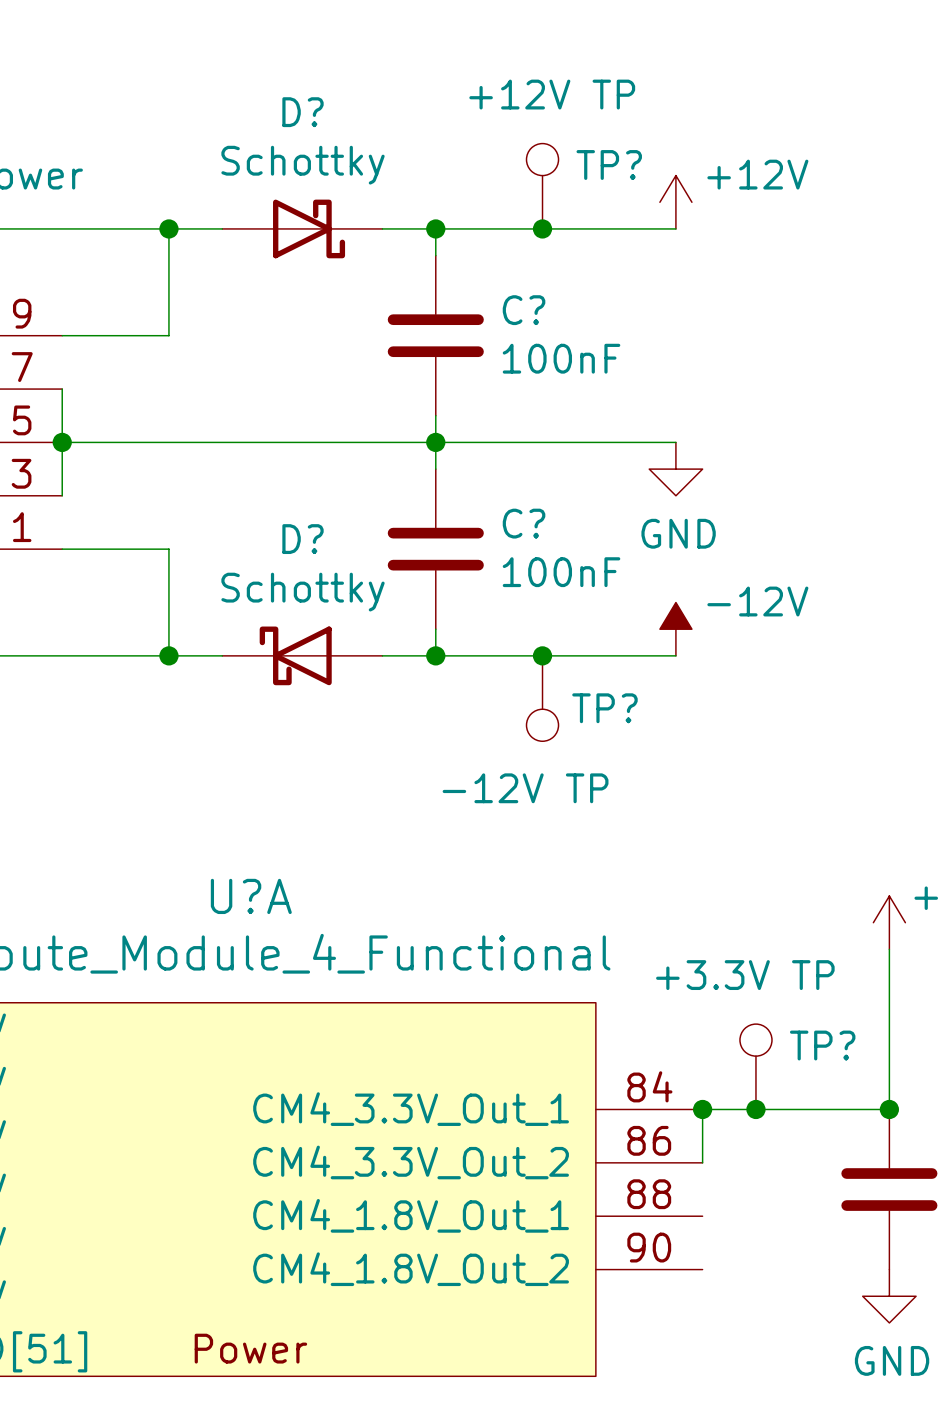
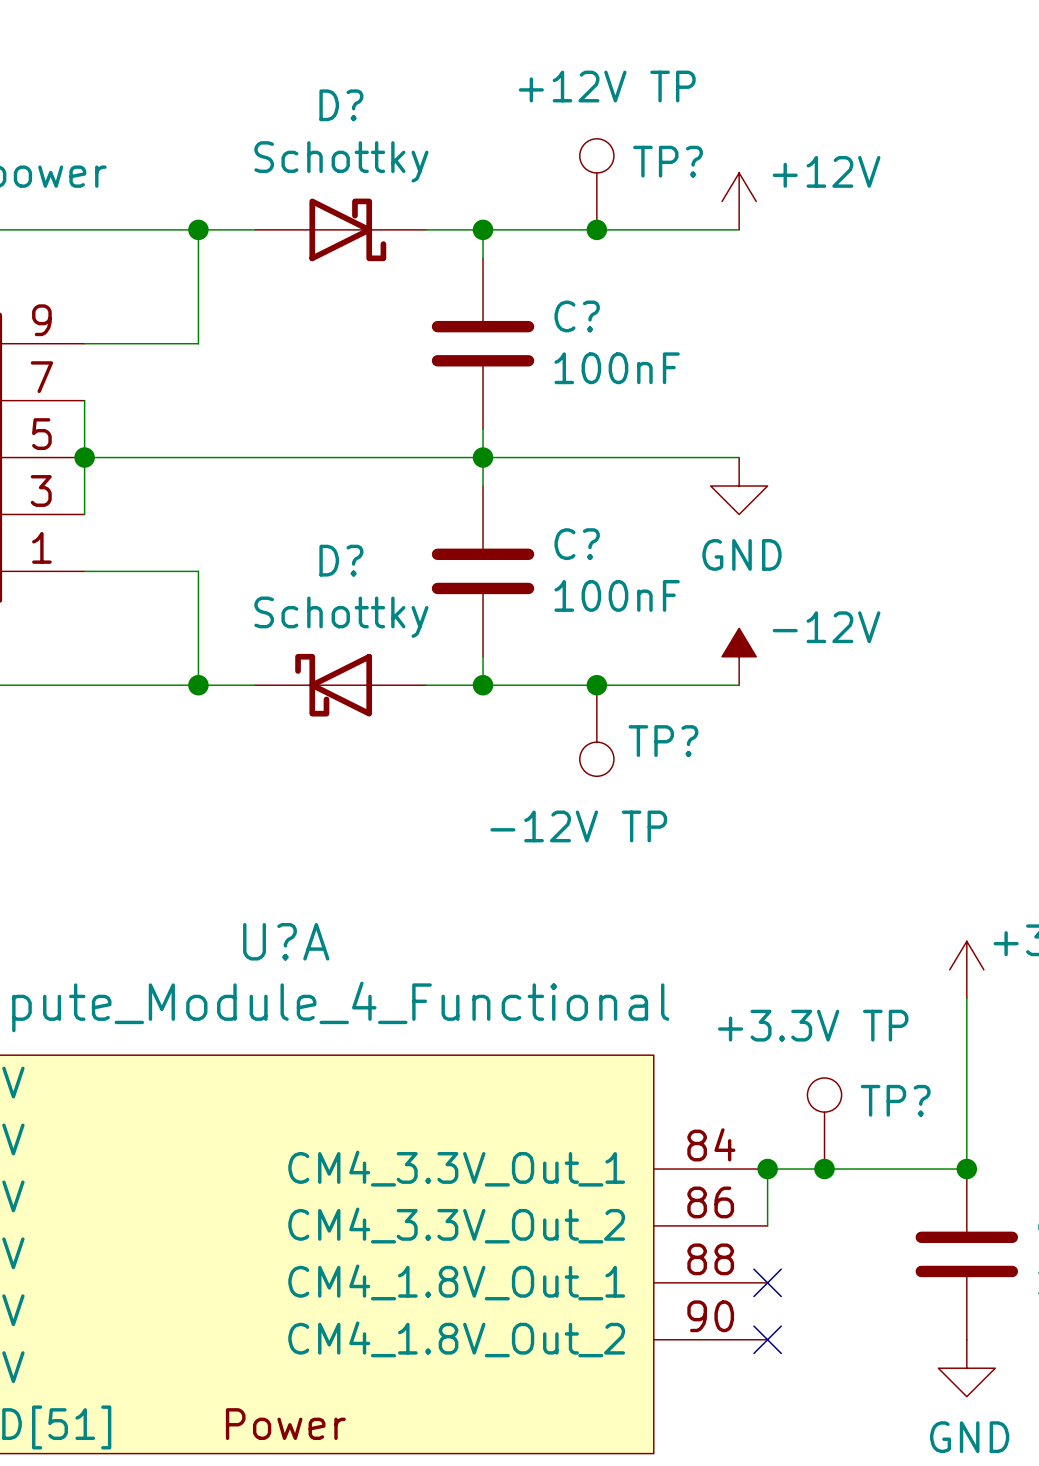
no-connect mark: none -> (767, 1282)
no-connect mark: none -> (767, 1339)

